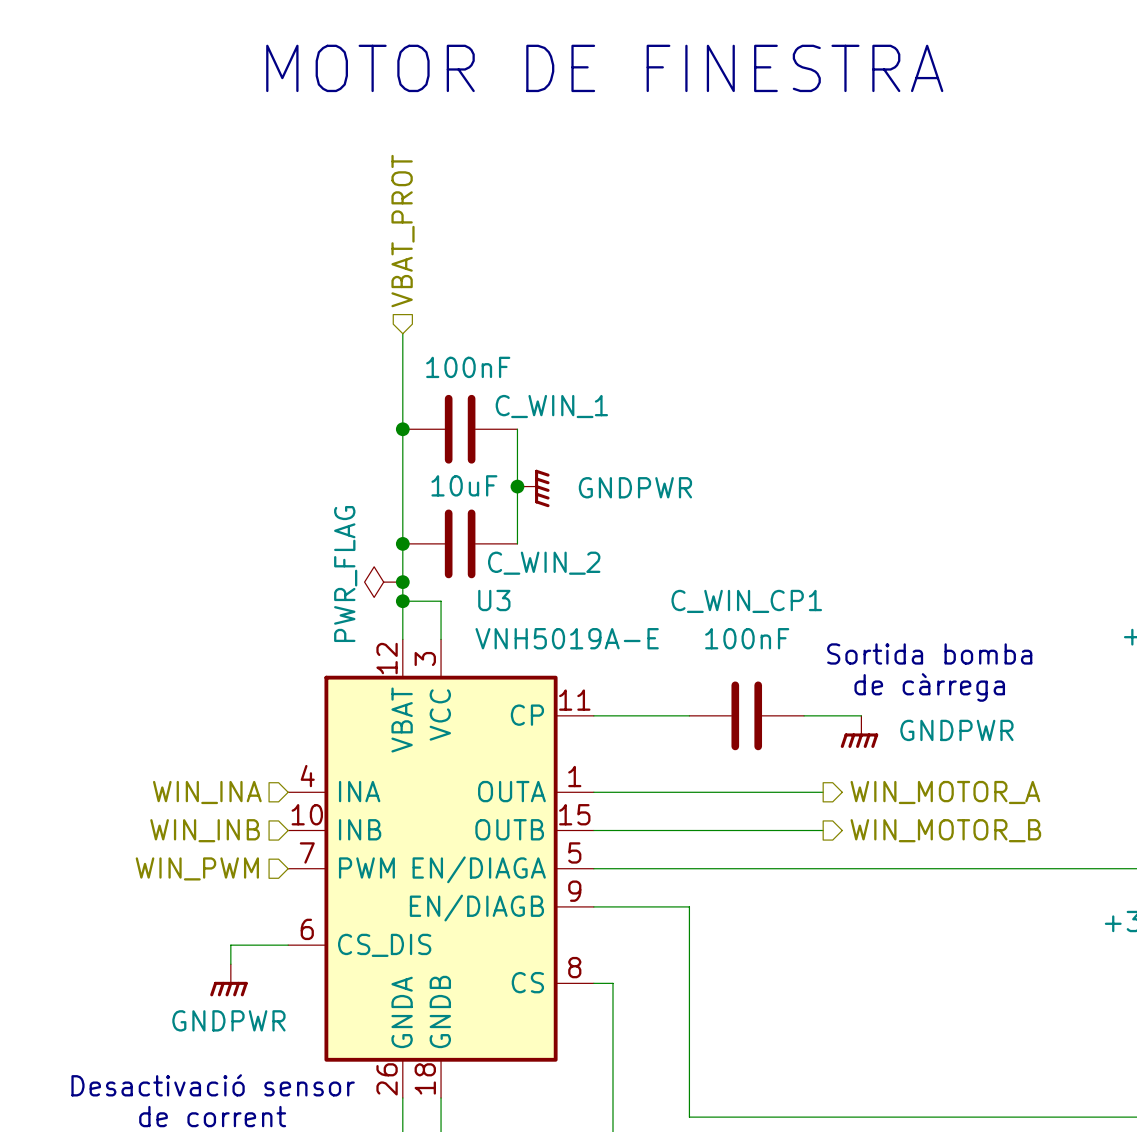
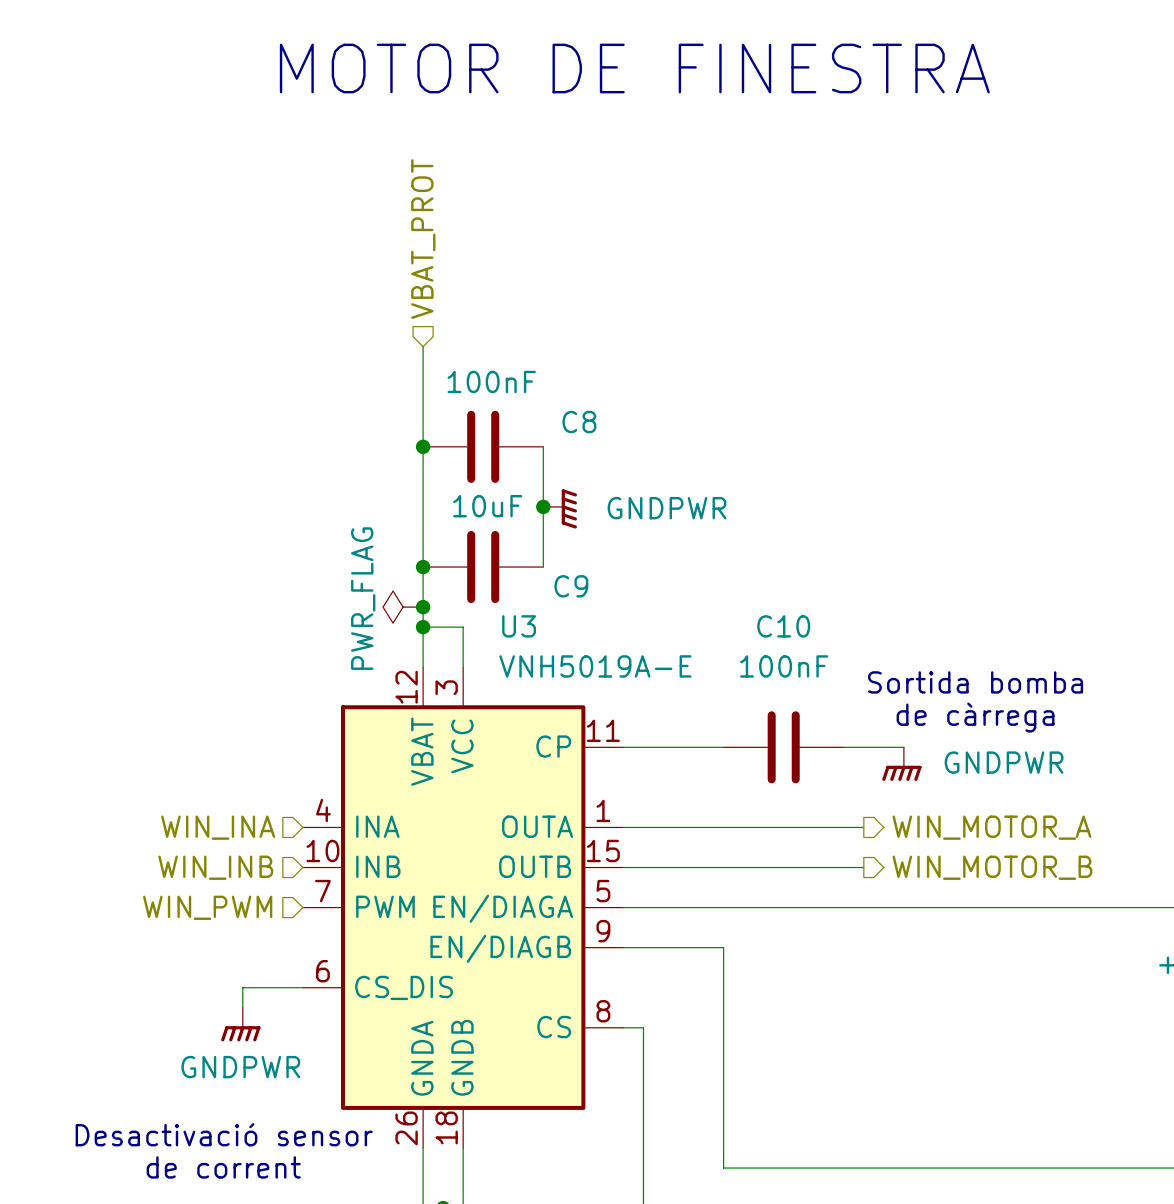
C_WIN_1 name: C_WIN_1 (551, 406) -> C8 (579, 422)
C_WIN_2 name: C_WIN_2 (544, 563) -> C9 (571, 586)
C_WIN_CP1 name: C_WIN_CP1 (746, 601) -> C10 (783, 626)

